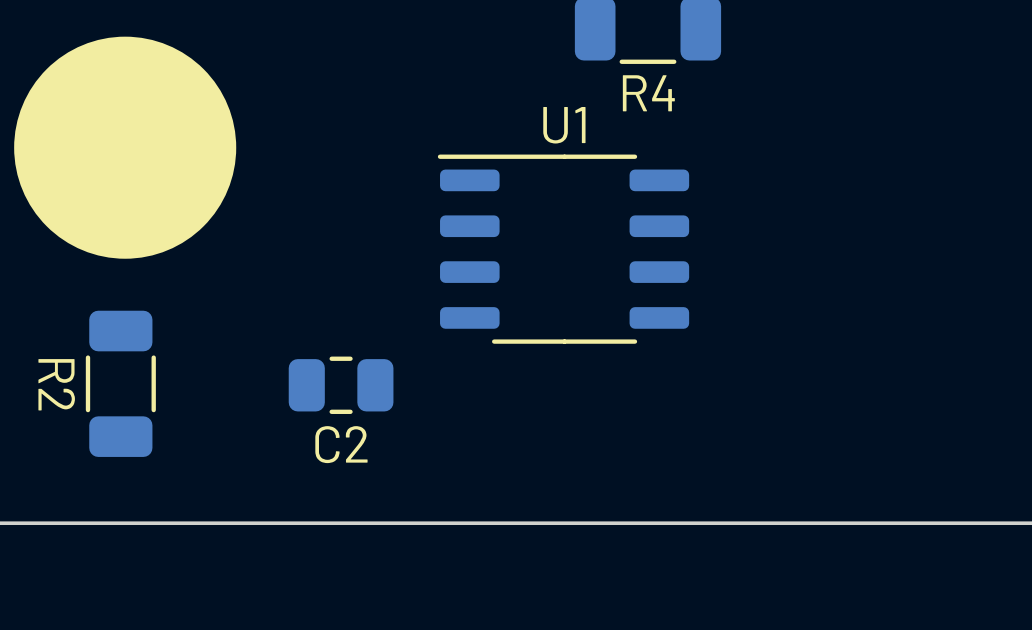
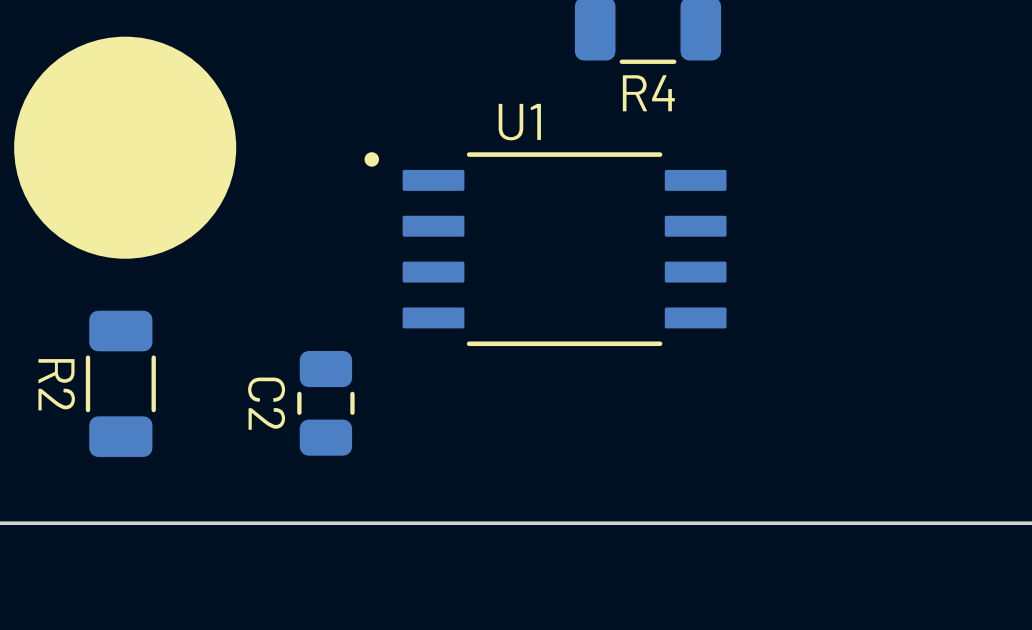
U1 footprint: [437, 154, 690, 344] -> [364, 152, 727, 347]
C2 rotation: 0° (341, 385) -> 90° clockwise (325, 403)

